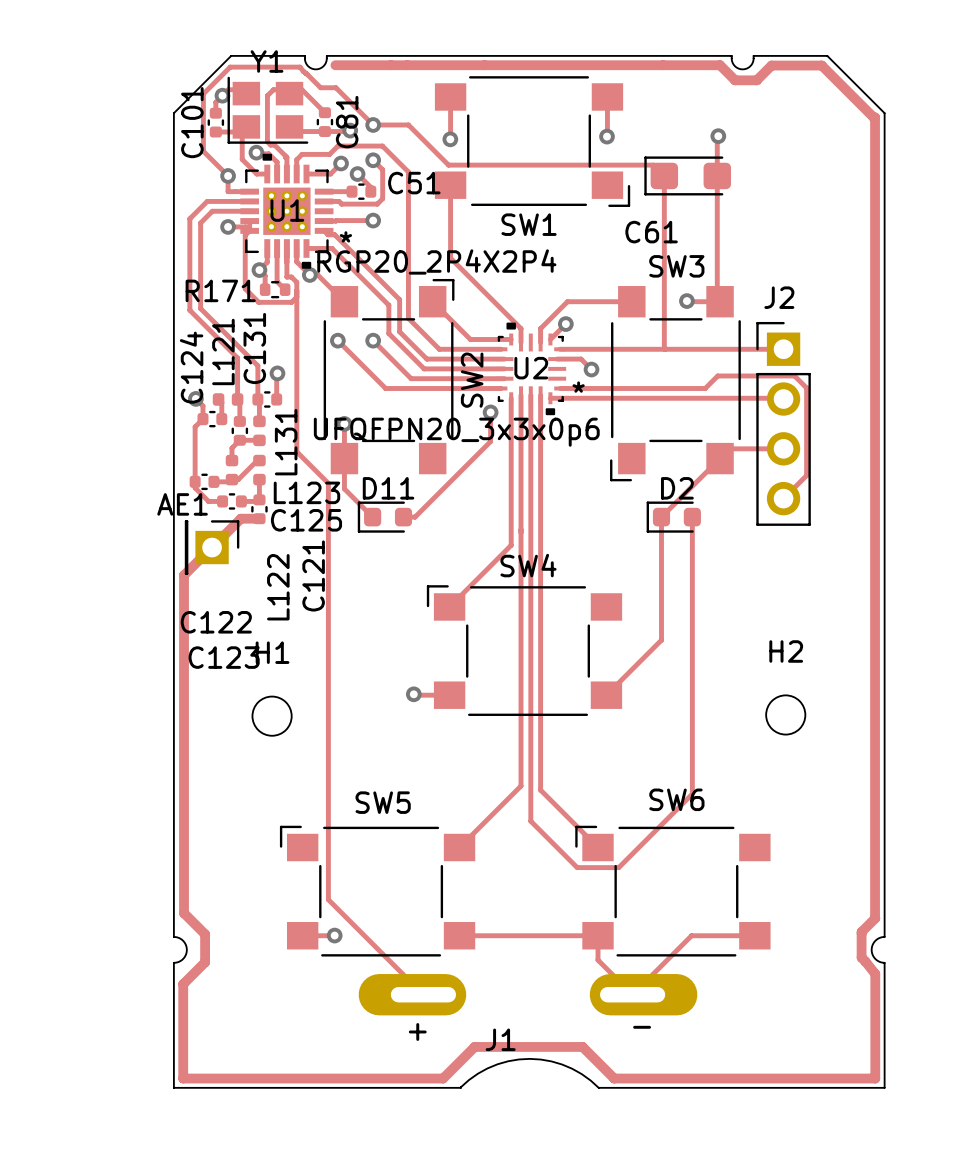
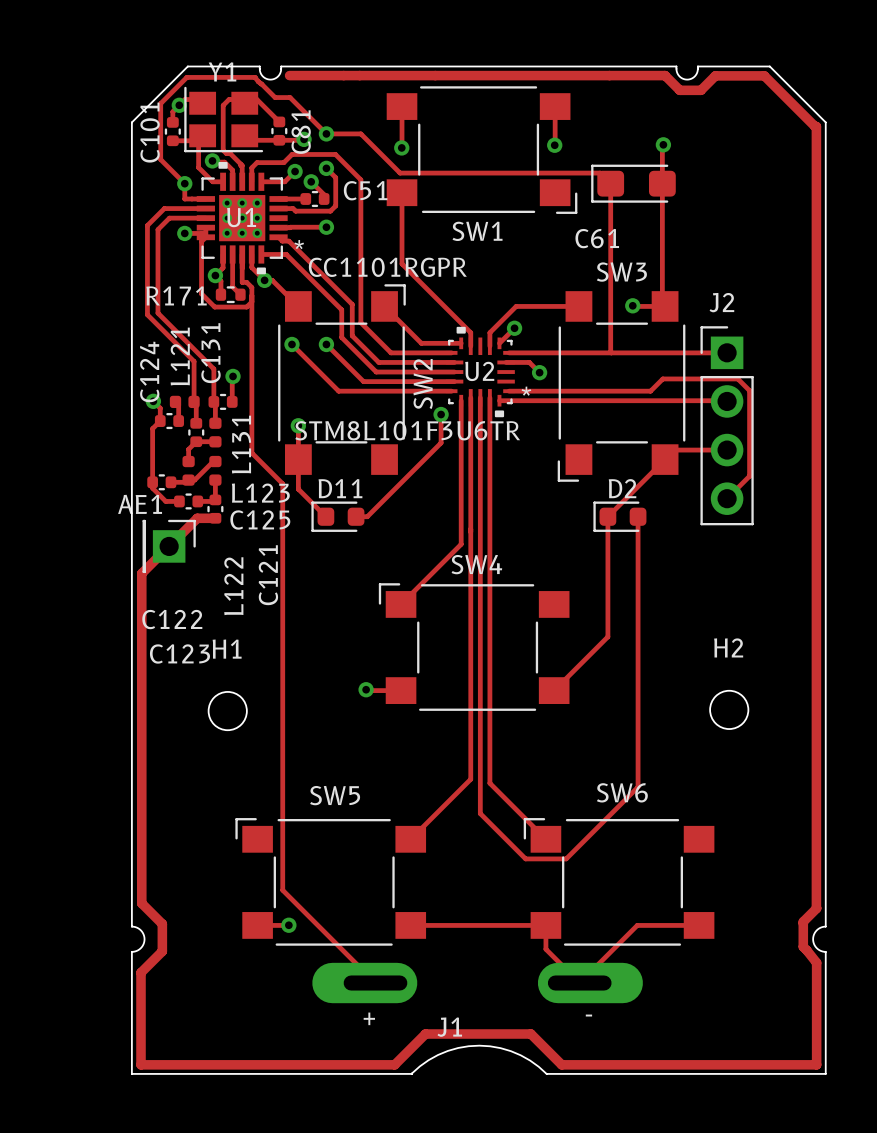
U1 value: RGP20_2P4X2P4 (436, 261) -> CC1101RGPR (387, 267)
U2 value: UFQFPN20_3x3x0p6 (456, 432) -> STM8L101F3U6TR (407, 430)

